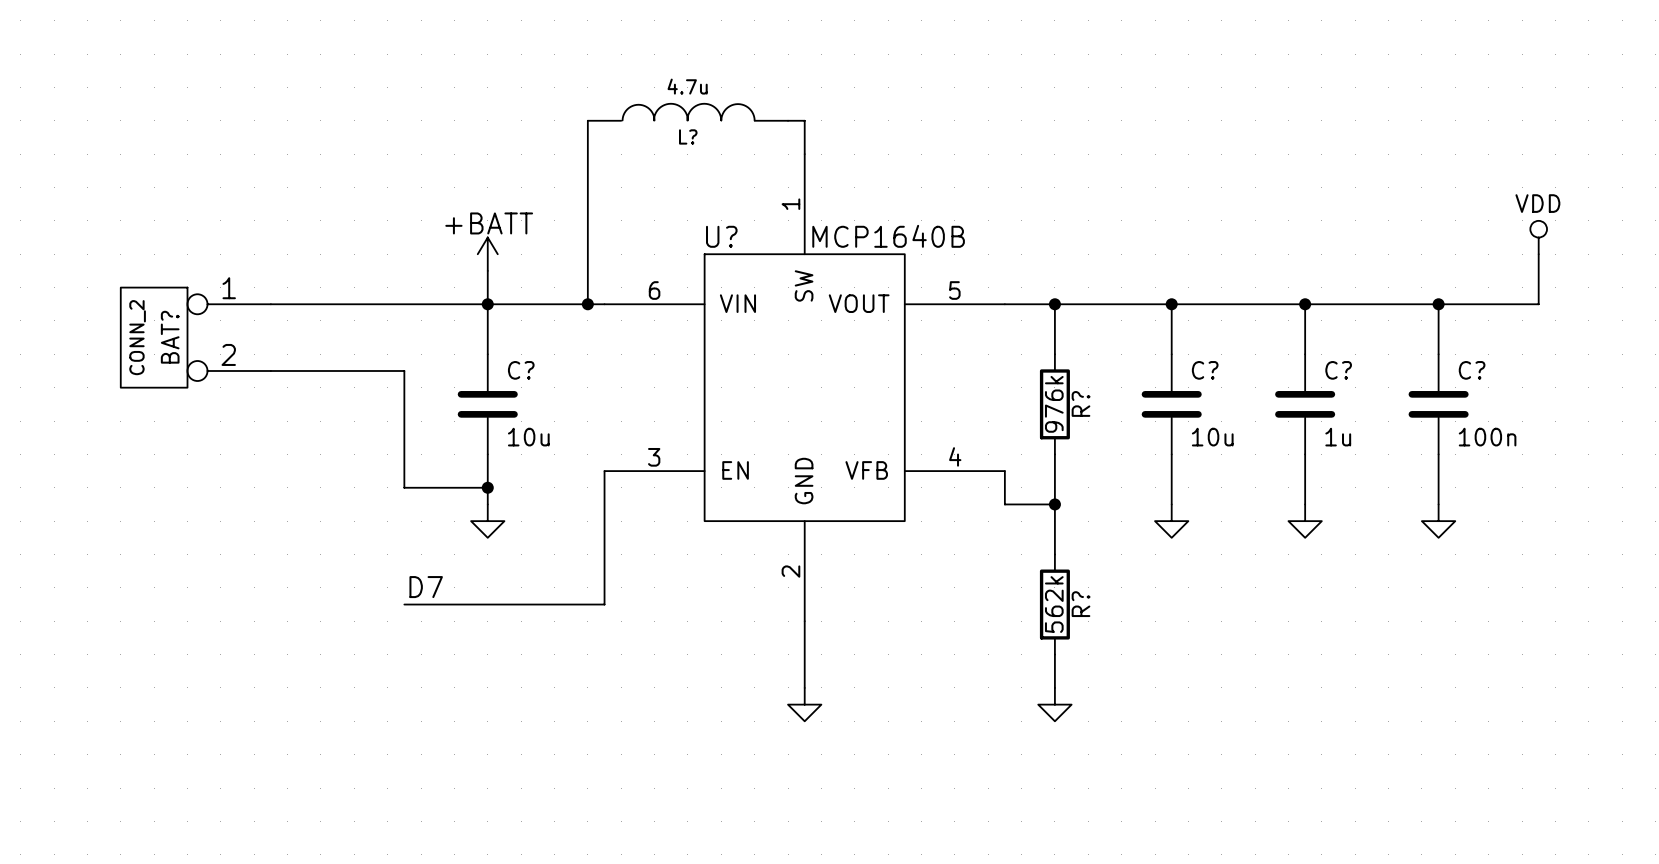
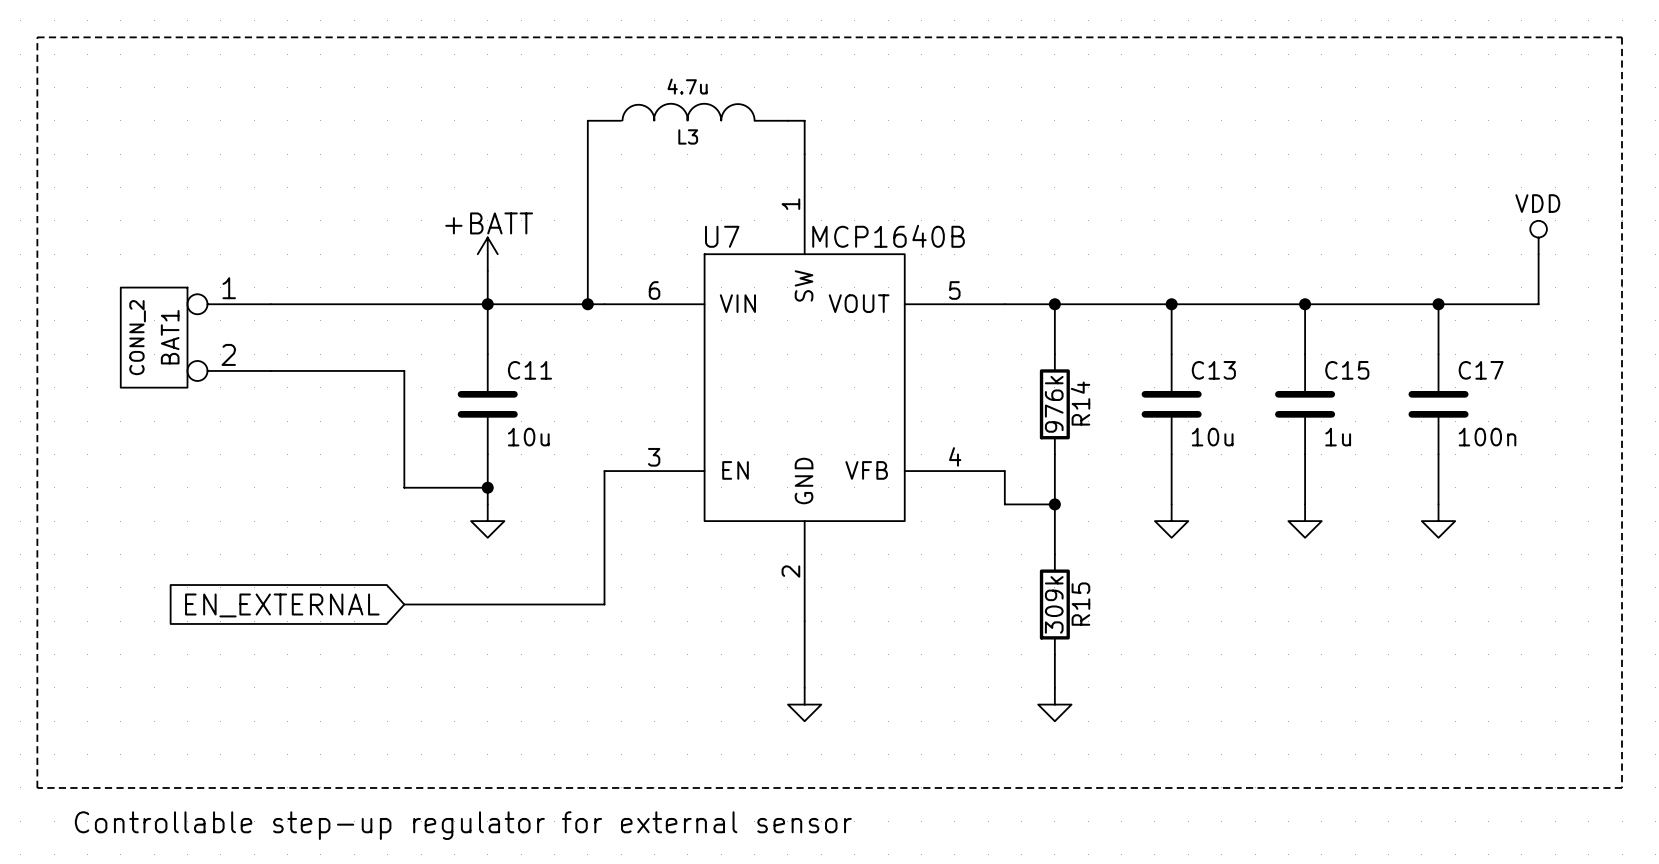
line: none -> (37, 37) (1622, 37) (1622, 787) (37, 787) (37, 37)
L? name: L? (688, 136) -> L3 (688, 136)
U? name: U? (721, 236) -> U7 (722, 236)
BAT? name: BAT? (170, 337) -> BAT1 (170, 337)
C? name: C? (521, 370) -> C11 (529, 370)
C? name: C? (1205, 370) -> C13 (1213, 370)
C? name: C? (1338, 370) -> C15 (1347, 370)
C? name: C? (1472, 370) -> C17 (1481, 370)
R? name: R? (1080, 403) -> R14 (1080, 403)
label: D7 (426, 587) -> none
R? value: 562k (1054, 604) -> 309k (1054, 604)
R? name: R? (1080, 604) -> R15 (1080, 604)
global label: none -> EN_EXTERNAL (282, 605)
text: none -> Controllable step-up regulator for external sensor (463, 825)

